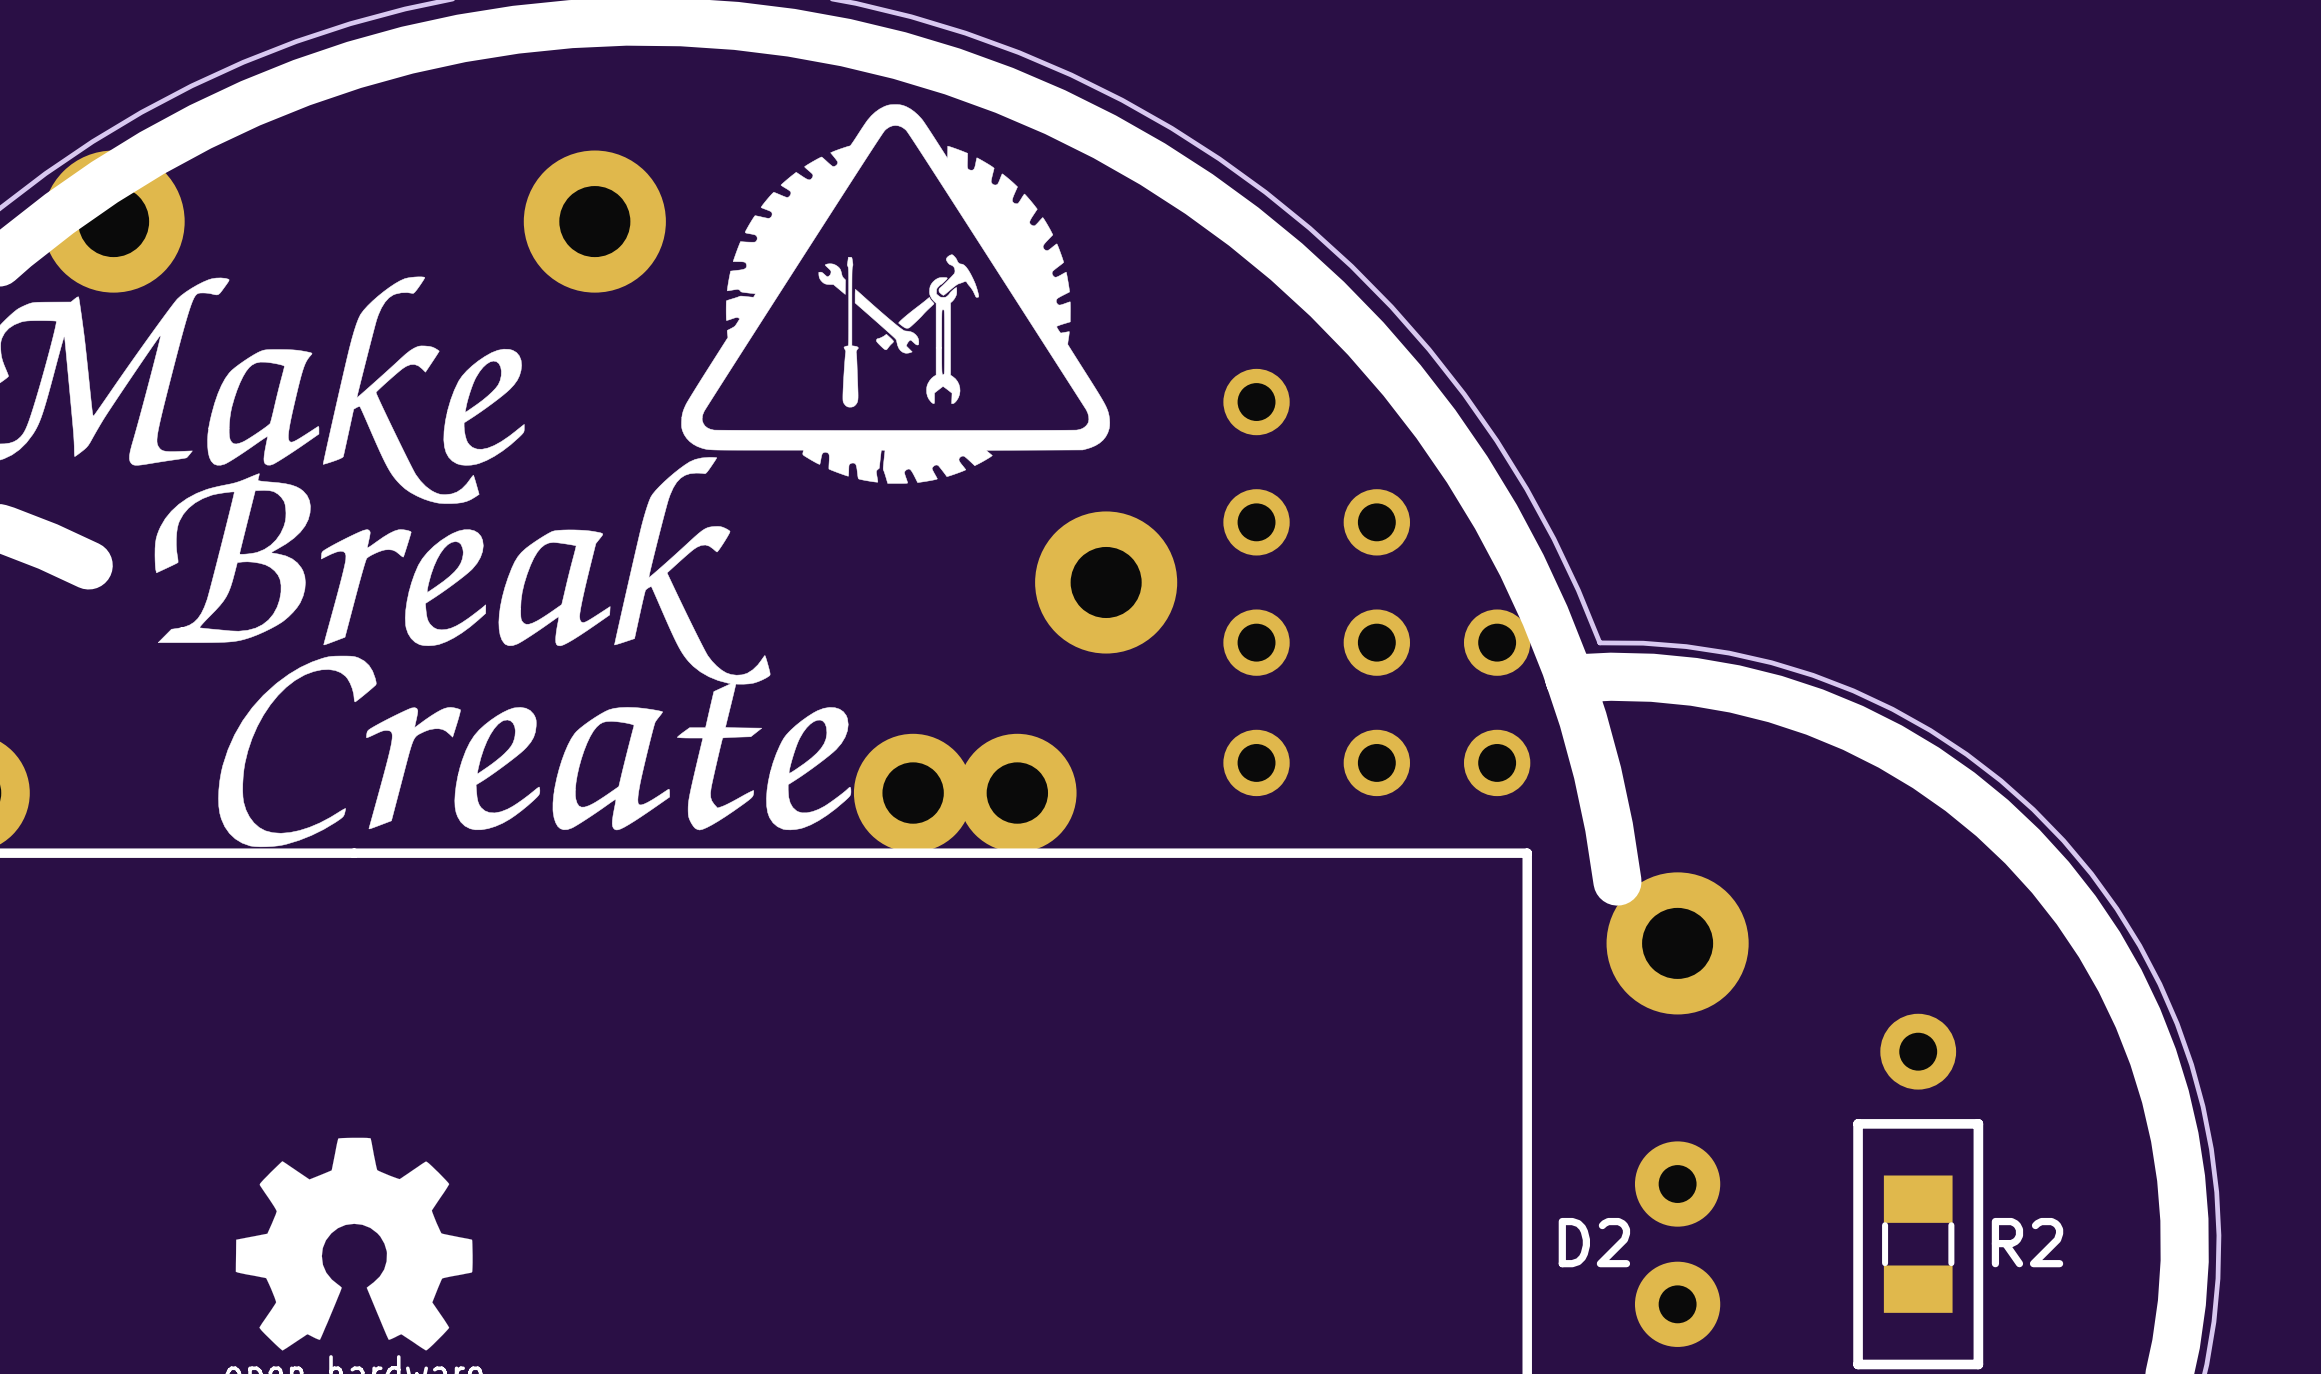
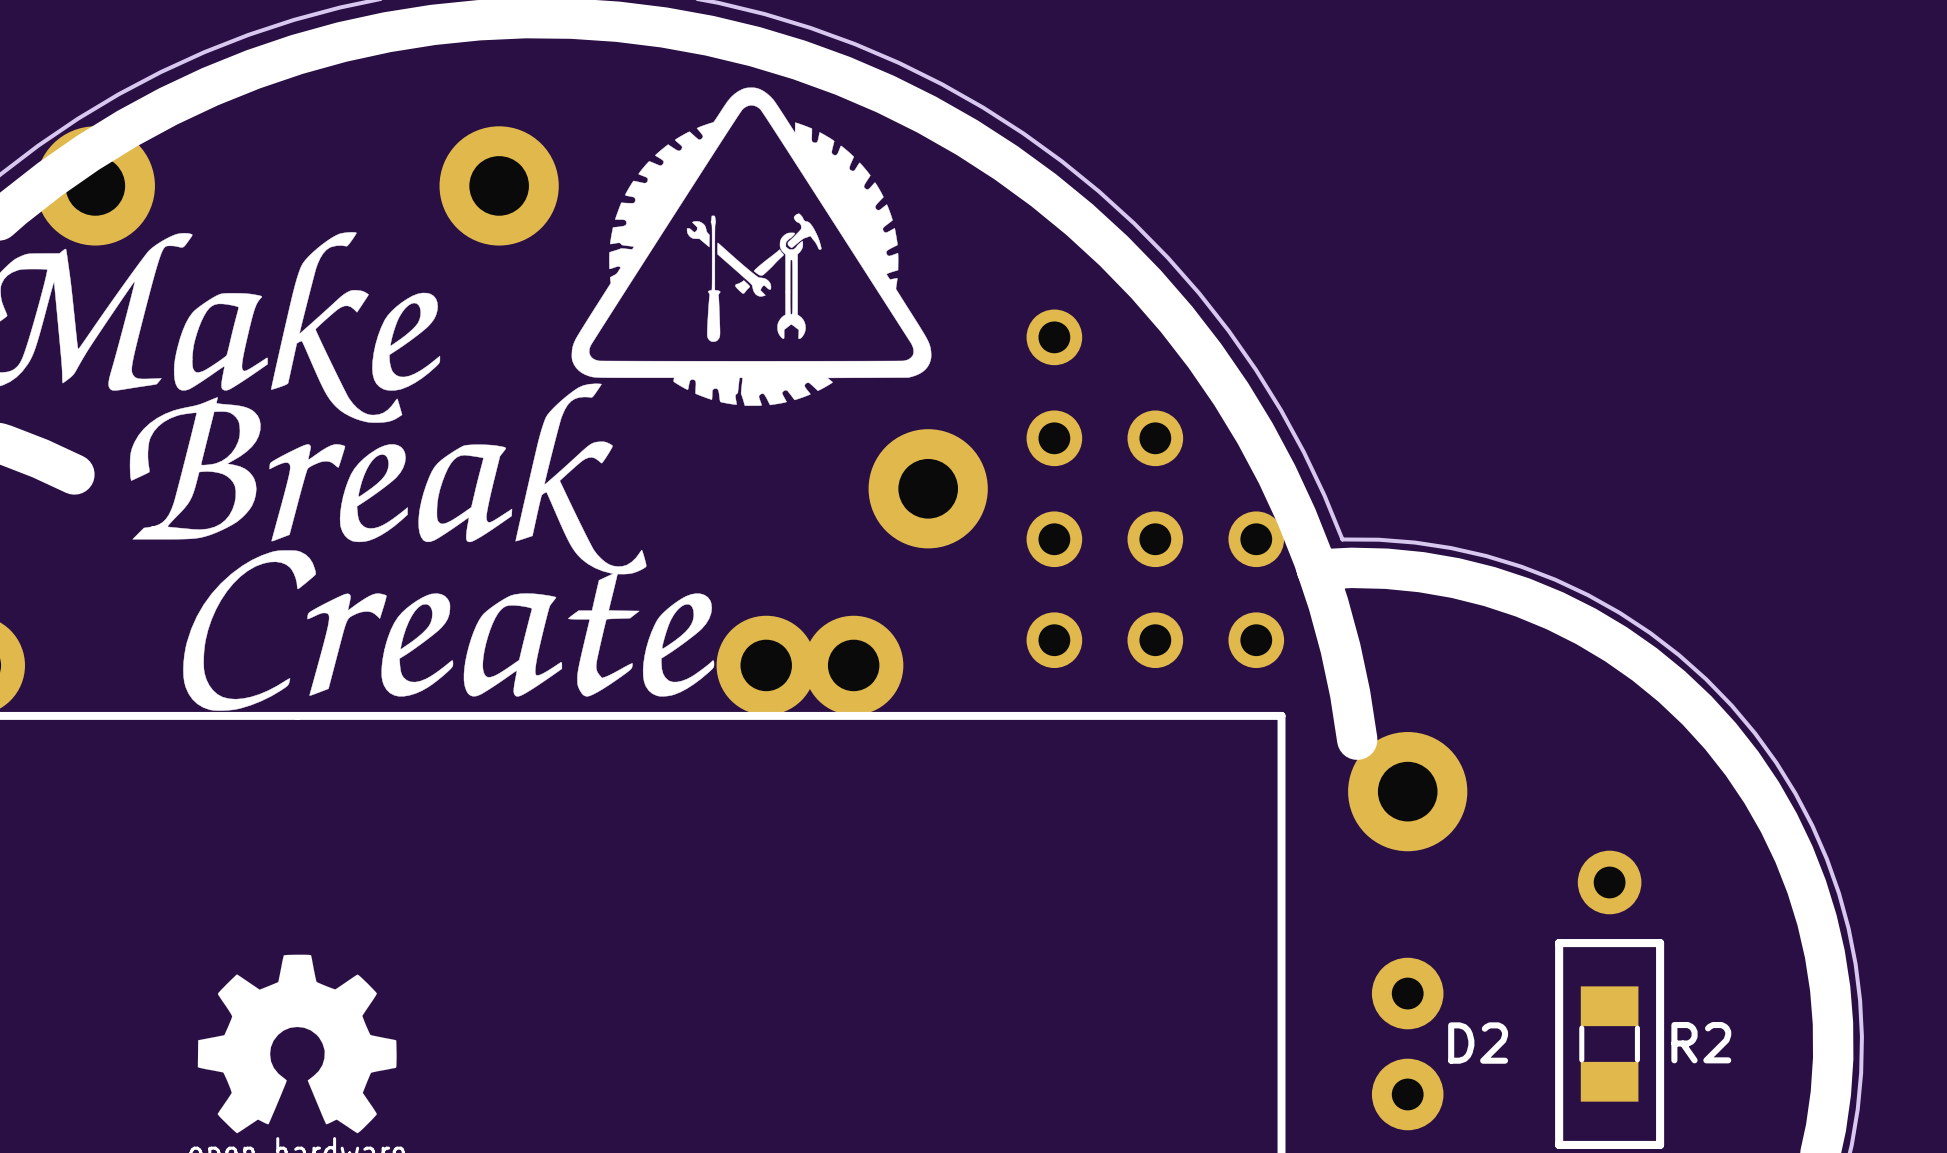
D2 name position: D2 (1594, 1242) -> D2 (1478, 1043)

